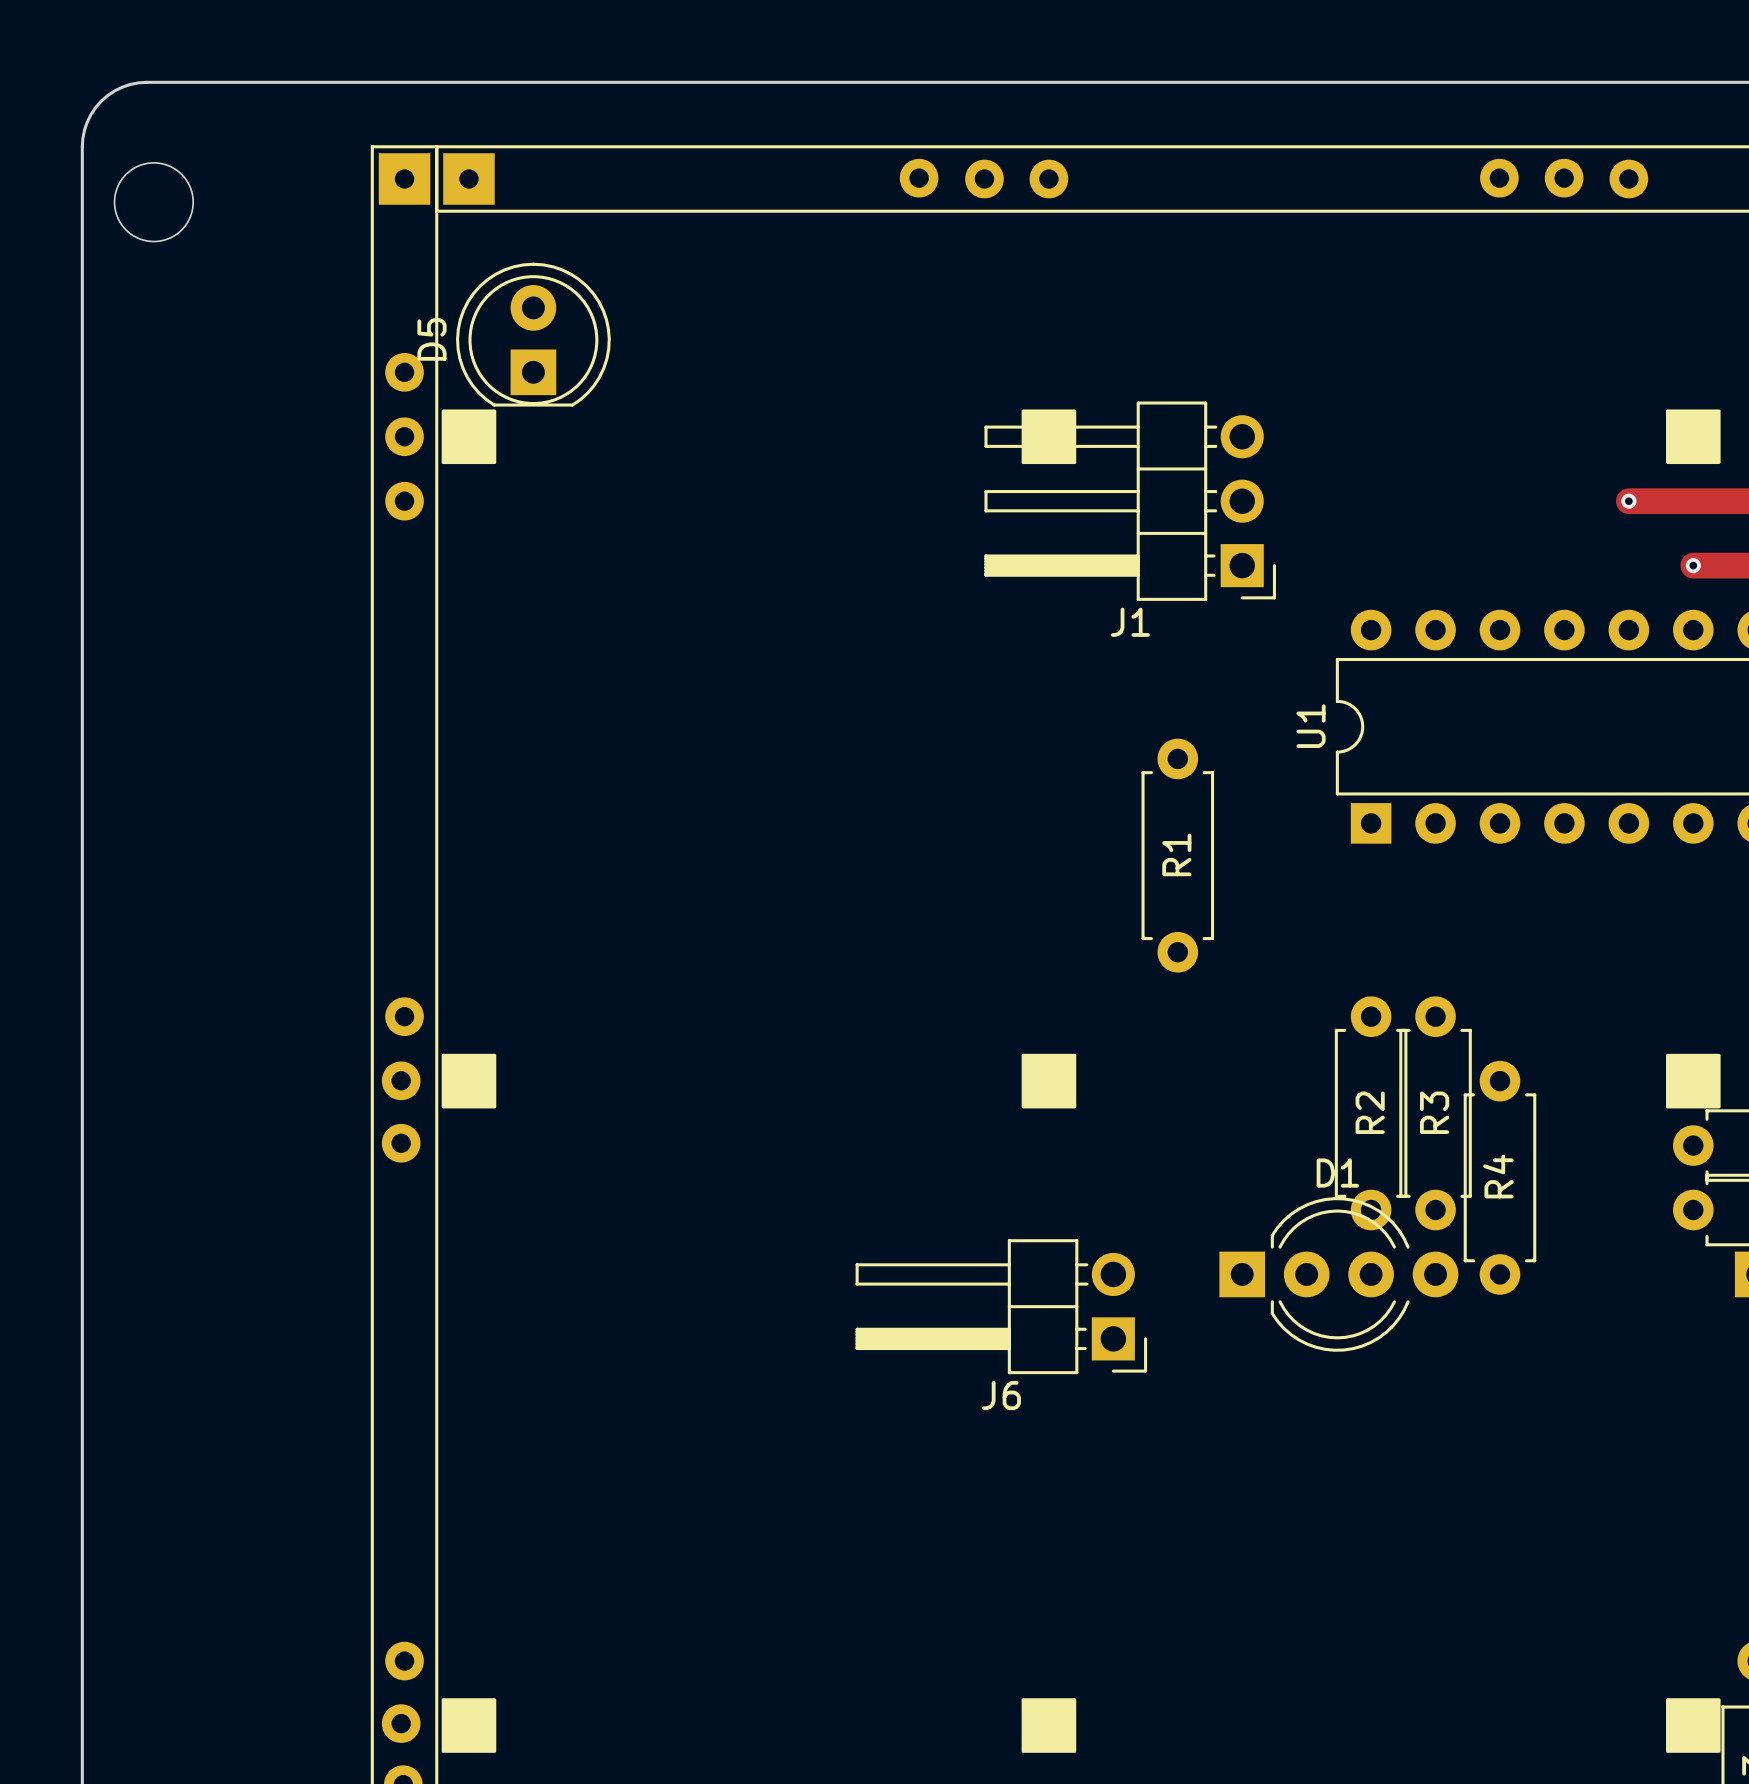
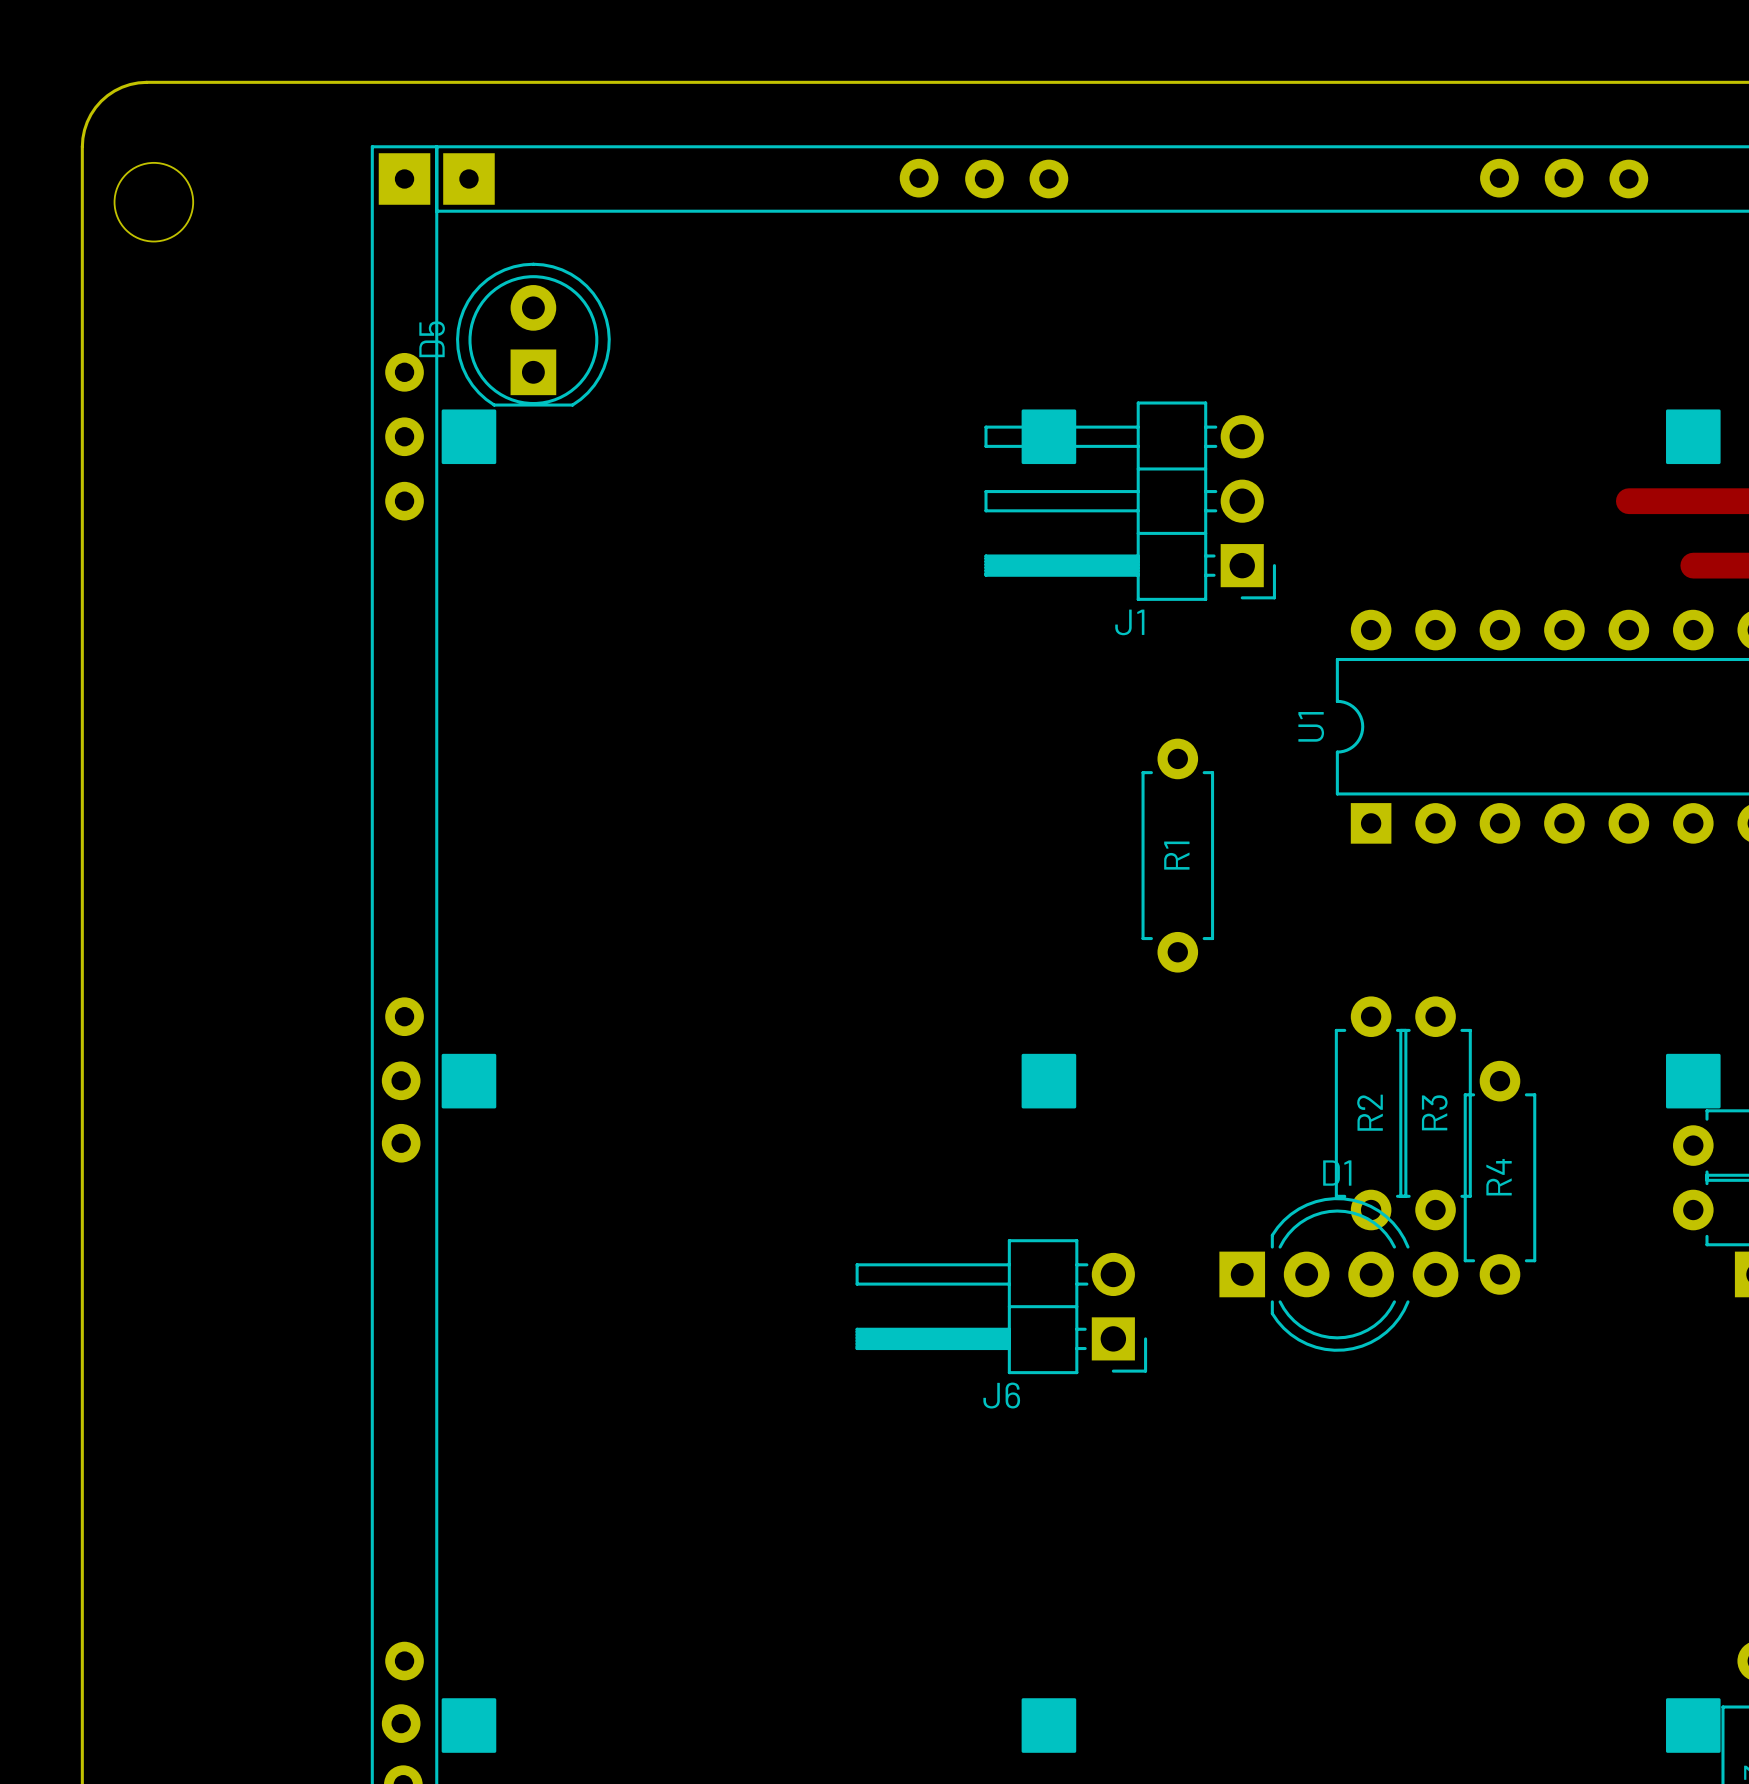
via: (1628, 501) -> none
via: (1693, 565) -> none

